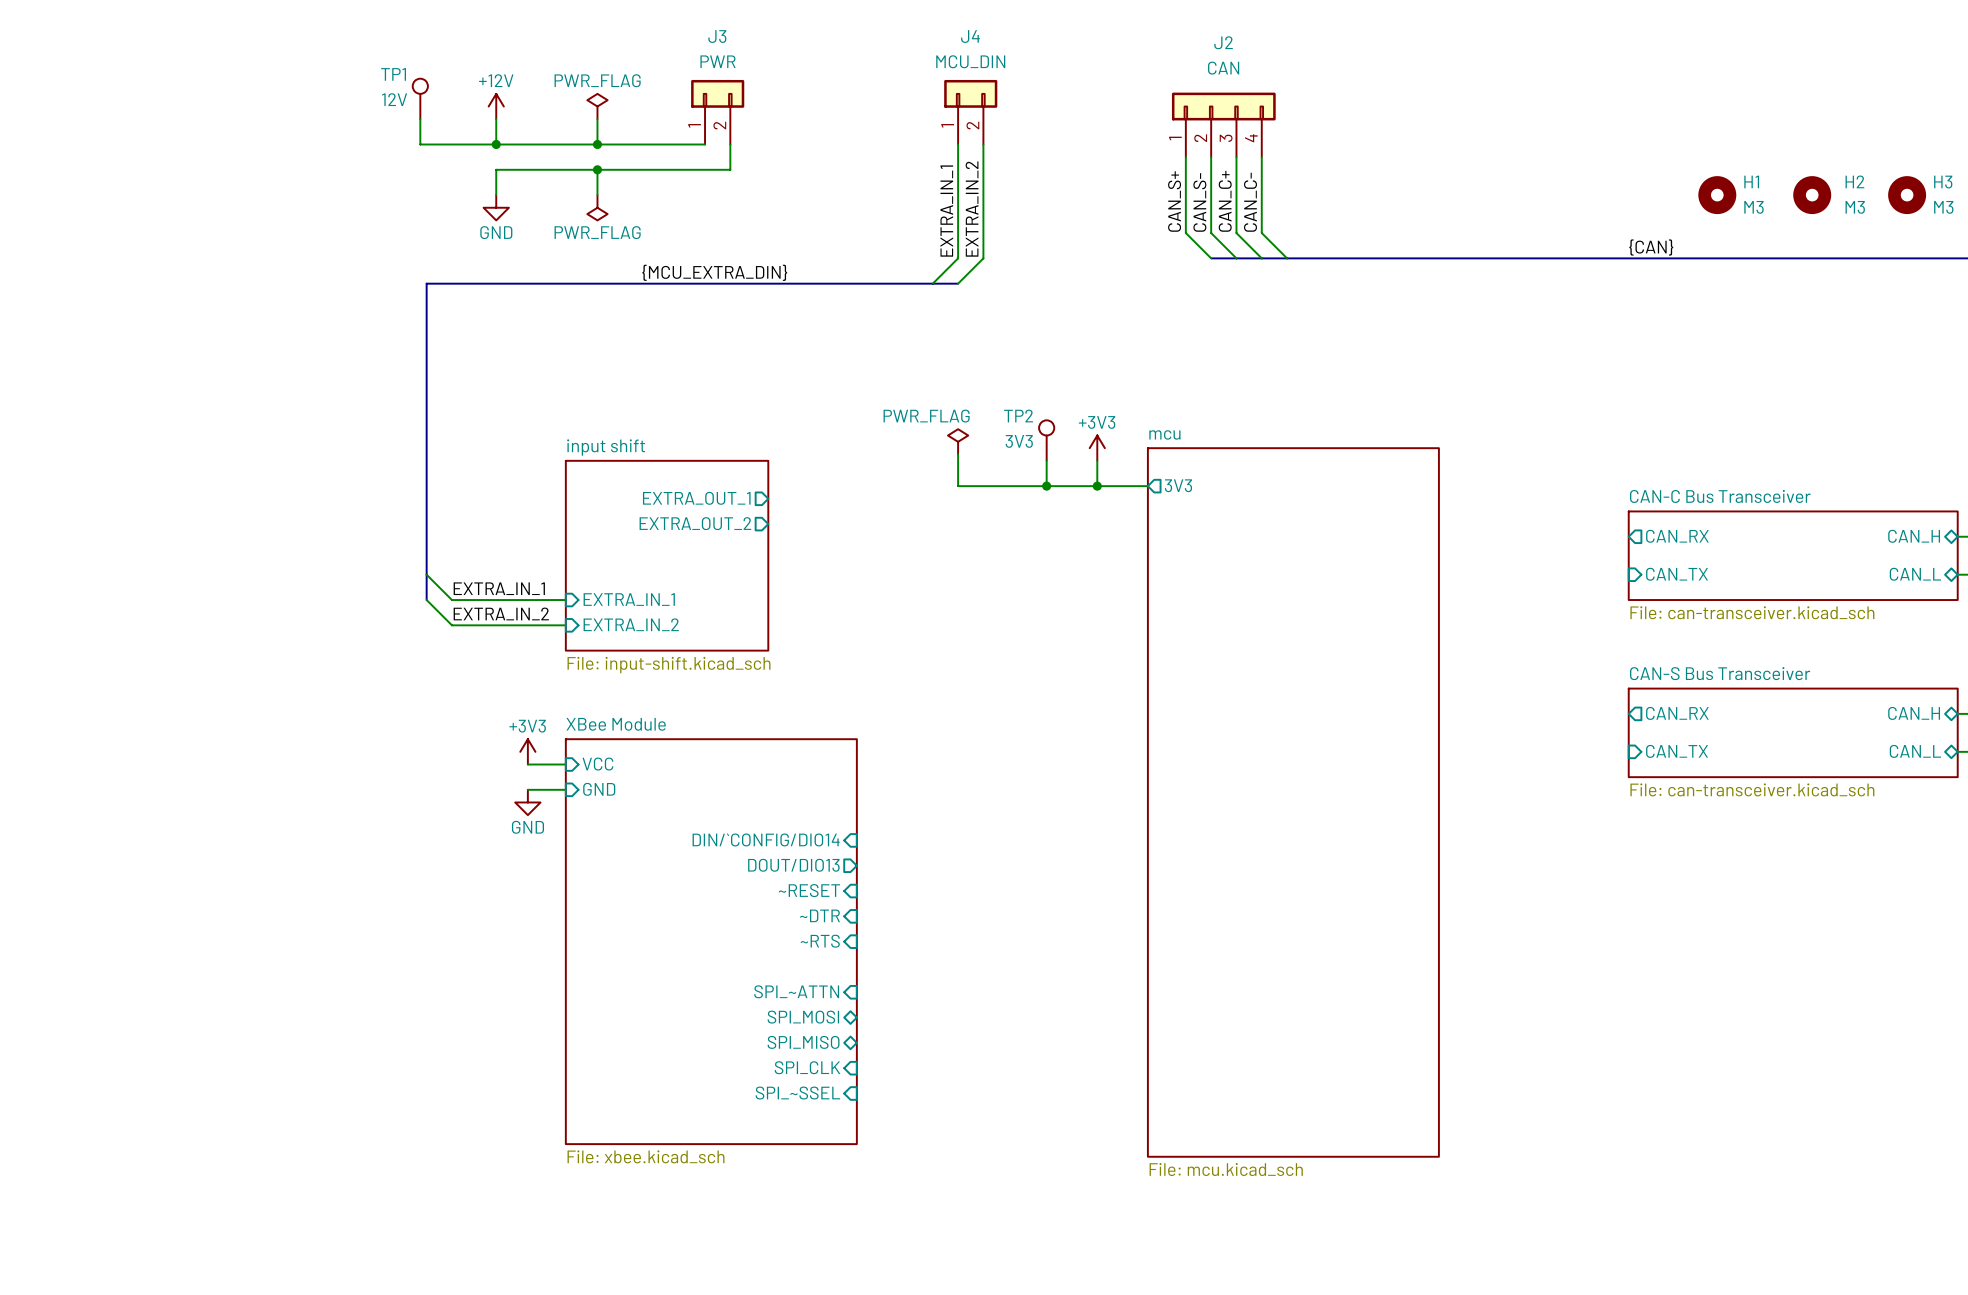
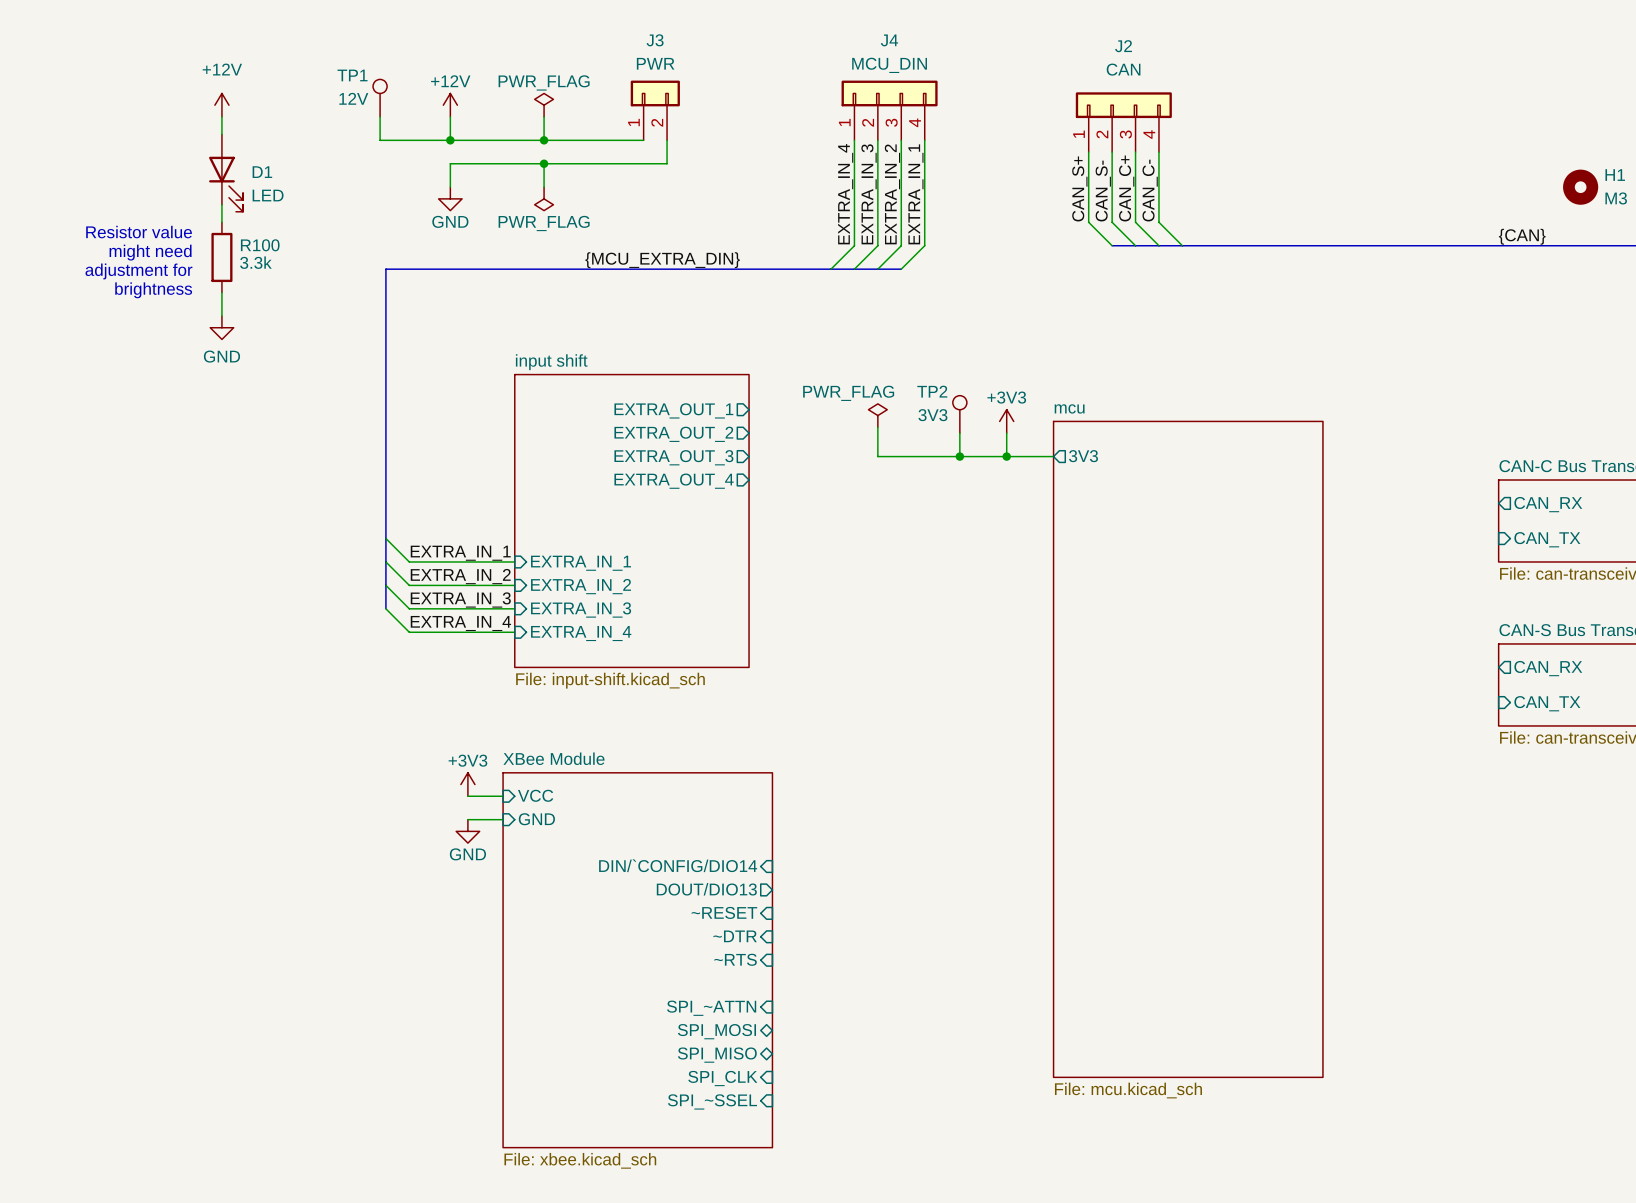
J4 symbol: [944, 79, 998, 145] -> [841, 80, 938, 141]
power symbol: none -> +12V (221, 105)
wire: none -> (221, 116) (221, 134)
wire: none -> (854, 140) (854, 245) (831, 269)
wire: none -> (924, 140) (924, 245) (901, 269)
D1: none -> LED (226, 173)
label: none -> EXTRA_IN_4 (845, 194)
label: EXTRA_IN_1 (946, 211) -> EXTRA_IN_3 (869, 194)
label: none -> EXTRA_IN_1 (915, 194)
wire: none -> (221, 204) (221, 222)
text: none -> Resistor value (139, 232)
text: none -> might need (150, 252)
R100: none -> 3.3k (221, 257)
bus: none -> (877, 269) (901, 269)
text: none -> adjustment for (138, 271)
text: none -> brightness (153, 290)
wire: none -> (221, 292) (221, 316)
power symbol: none -> GND (221, 327)
sheet pin: none -> EXTRA_OUT_3 (673, 457)
sheet pin position: EXTRA_OUT_1 (696, 498) -> EXTRA_OUT_1 (673, 410)
sheet pin: none -> EXTRA_OUT_4 (674, 481)
sheet pin position: EXTRA_OUT_2 (695, 523) -> EXTRA_OUT_2 (673, 434)
sheet input shift: File: input-shift.kicad_sch (667, 555) -> none
sheet input shift: none -> File: input-shift.kicad_sch (631, 520)
bus: none -> (385, 561) (385, 608)
wire: none -> (385, 585) (409, 608) (514, 608)
label: none -> EXTRA_IN_3 (460, 599)
wire: none -> (385, 608) (409, 632) (514, 632)
sheet pin: none -> EXTRA_IN_3 (581, 610)
label: none -> EXTRA_IN_4 (460, 623)
sheet pin: none -> EXTRA_IN_4 (581, 633)
power symbol position: +3V3 (527, 751) -> +3V3 (467, 784)
wire: (527, 764) (565, 764) -> (467, 796) (503, 796)
sheet pin position: VCC (597, 764) -> VCC (535, 795)
wire: (527, 789) (565, 789) -> (467, 819) (503, 819)
sheet pin position: GND (599, 789) -> GND (536, 819)
power symbol position: GND (527, 802) -> GND (467, 831)
sheet pin position: DIN/`CONFIG/DIO14 (766, 839) -> DIN/`CONFIG/DIO14 (678, 865)
sheet pin position: DOUT/DIO13 (793, 865) -> DOUT/DIO13 (706, 889)
sheet pin position: ~RESET (809, 890) -> ~RESET (724, 912)
sheet pin position: ~DTR (819, 915) -> ~DTR (735, 936)
sheet XBee Module position: (711, 941) -> (637, 960)
sheet pin position: ~RTS (820, 941) -> ~RTS (735, 959)
sheet pin position: SPI_~ATTN (796, 991) -> SPI_~ATTN (711, 1008)
sheet pin position: SPI_MOSI (803, 1017) -> SPI_MOSI (716, 1031)
sheet pin position: SPI_MISO (803, 1042) -> SPI_MISO (717, 1055)
sheet pin position: SPI_CLK (807, 1067) -> SPI_CLK (722, 1078)
sheet pin position: SPI_~SSEL (797, 1093) -> SPI_~SSEL (712, 1101)

